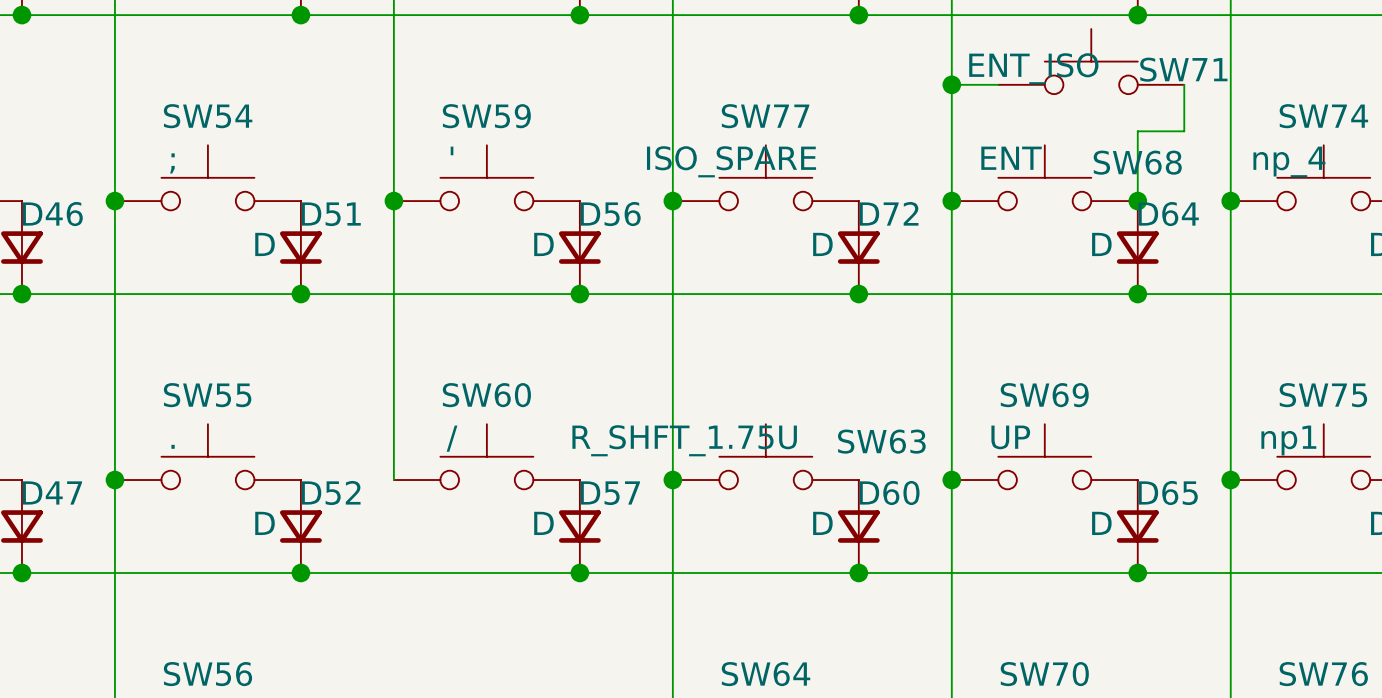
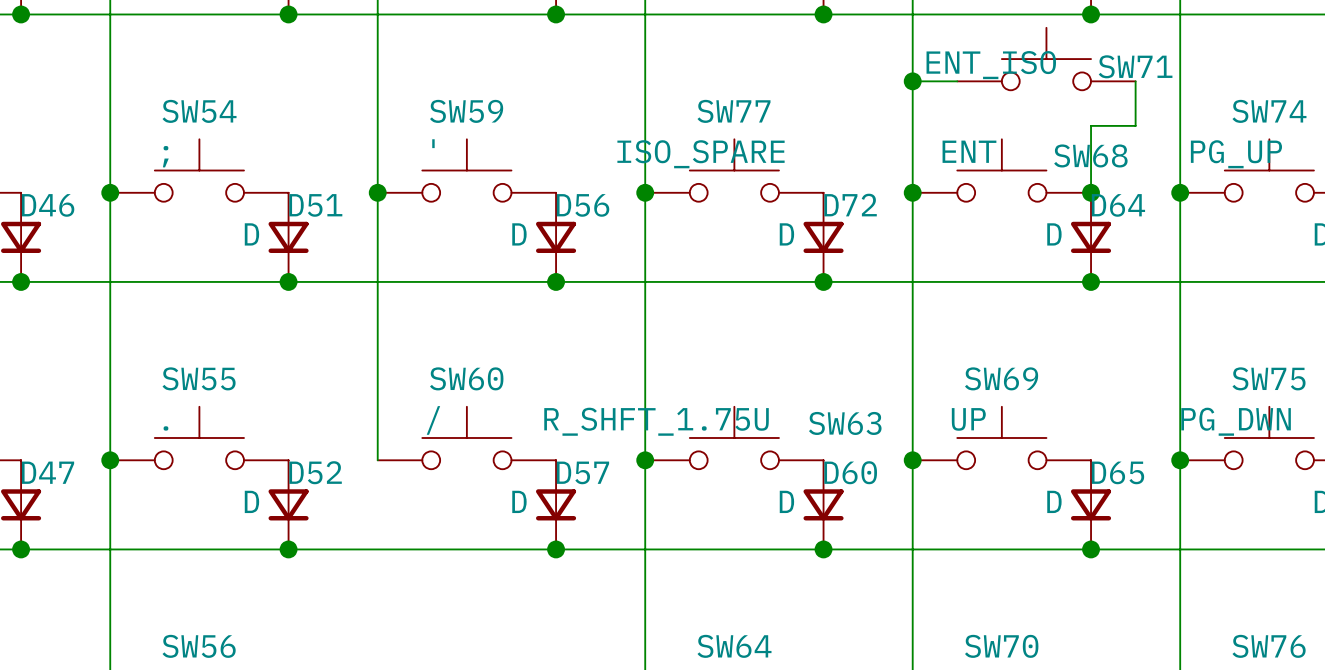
SW74 value: np_4 (1289, 162) -> PG_UP (1236, 154)
SW75 value: np1 (1288, 440) -> PG_DWN (1236, 421)

